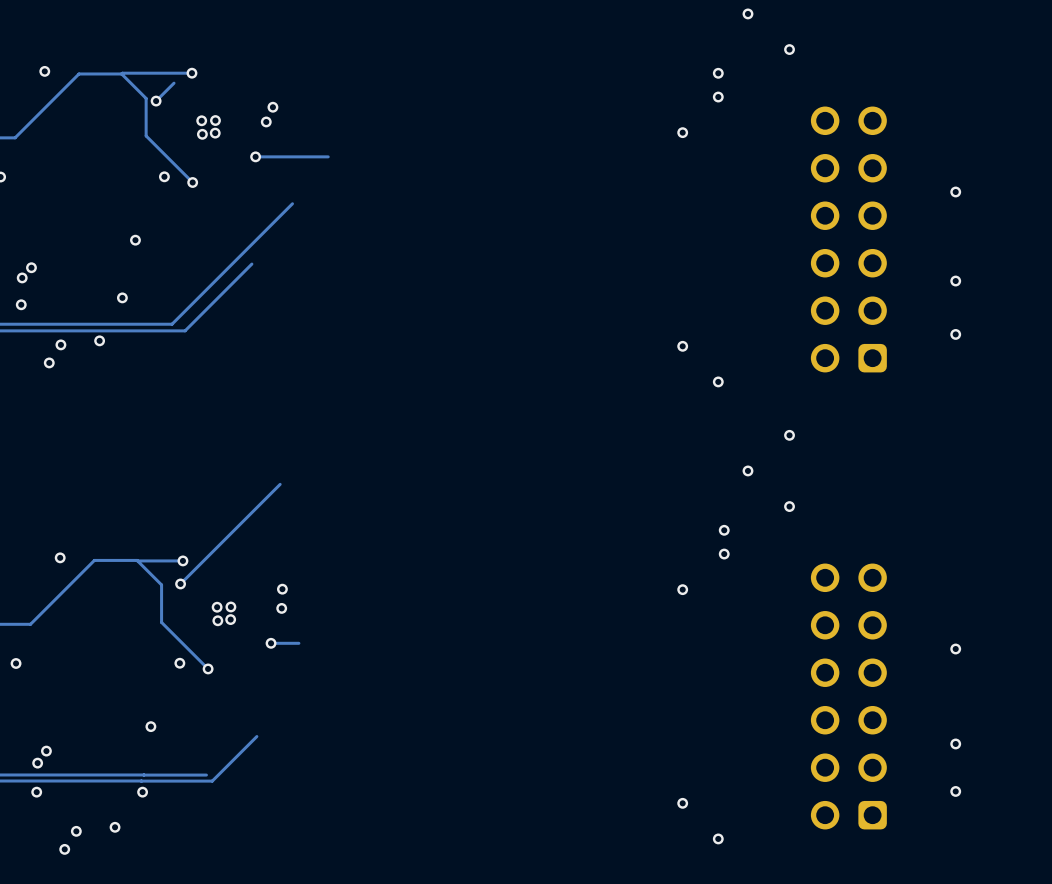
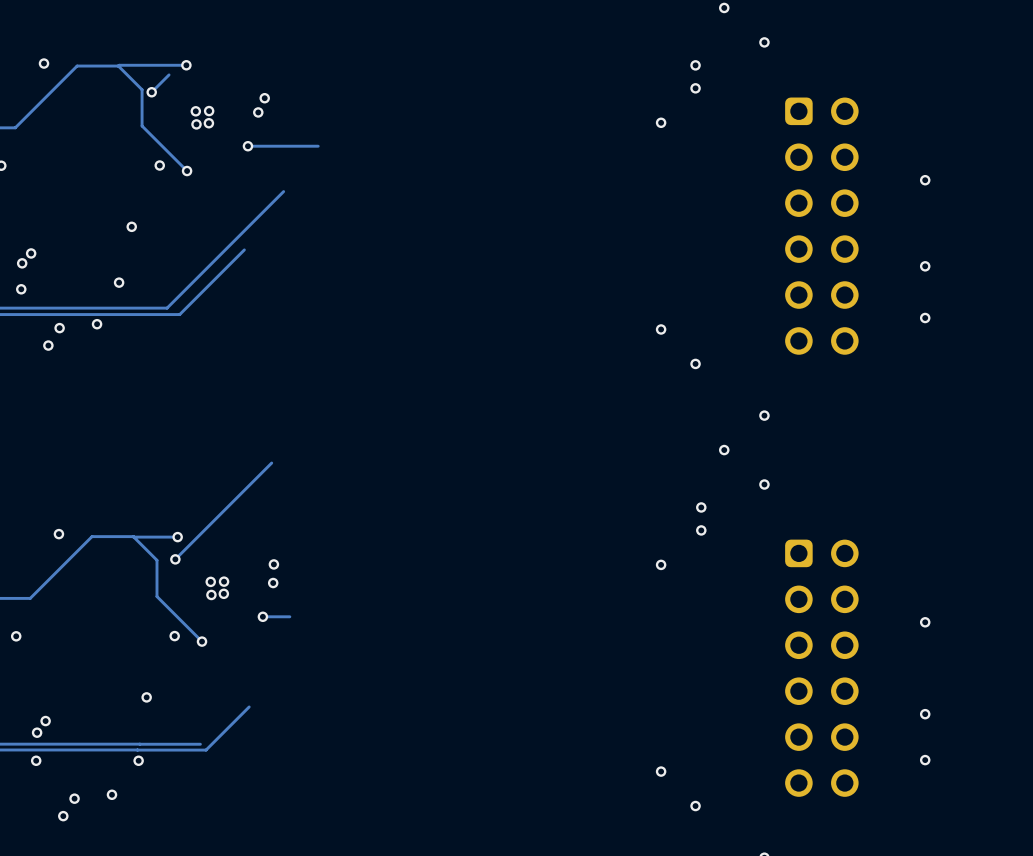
part rotation: 0° (848, 239) -> 180° (821, 226)
part rotation: 0° (848, 696) -> 180° (821, 668)

